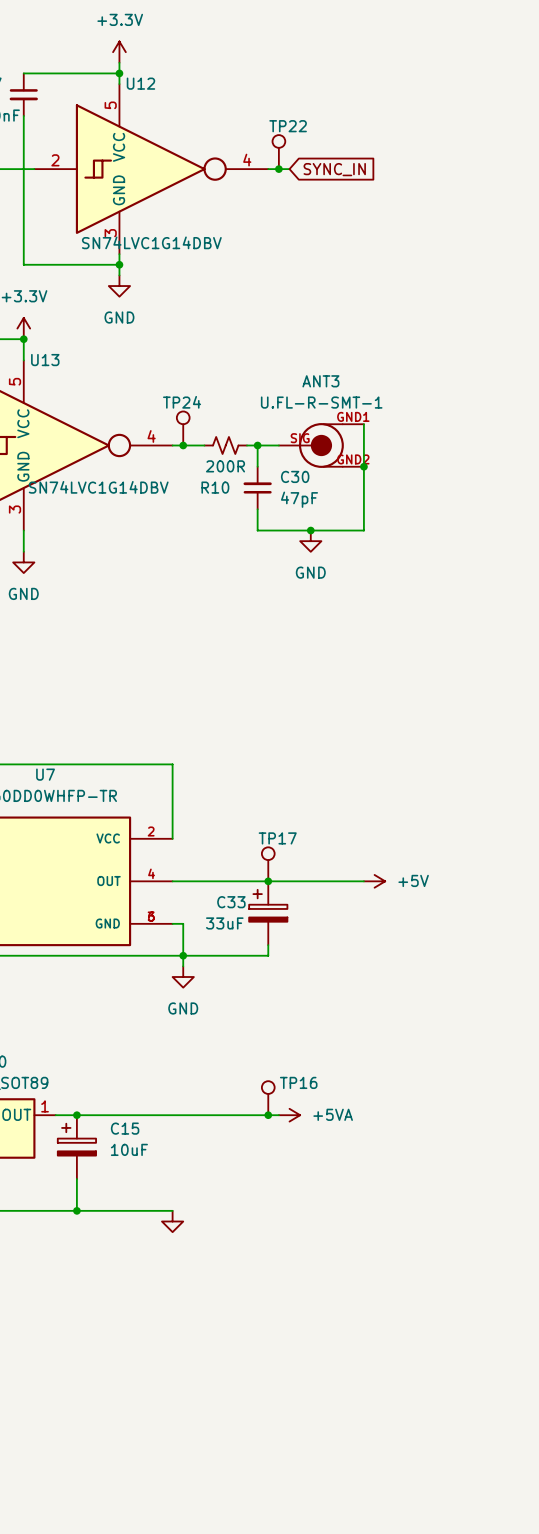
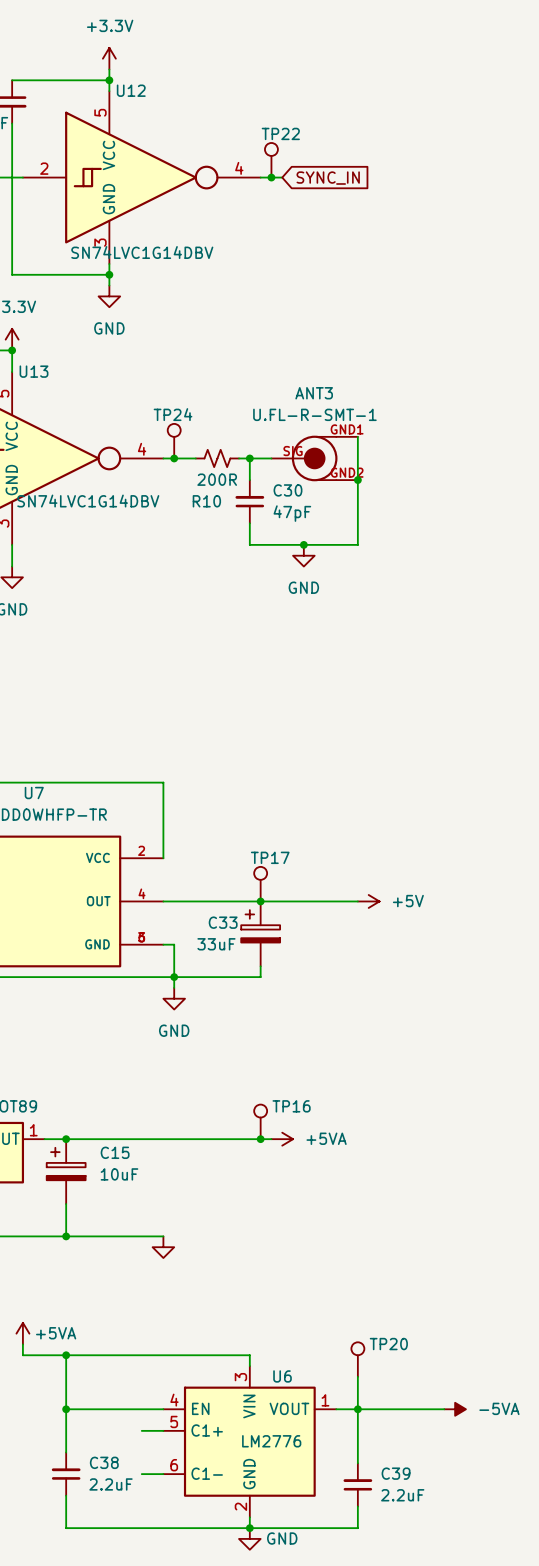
power symbol: none -> +5VA (22, 1333)
wire: none -> (22, 1344) (22, 1355) (249, 1355) (249, 1366)
wire: none -> (66, 1355) (66, 1452)
junction: none -> (66, 1355)
TP20: none -> (357, 1359)
wire: none -> (357, 1376) (357, 1463)
wire: none -> (66, 1409) (163, 1409)
junction: none -> (66, 1409)
wire: none -> (336, 1409) (444, 1409)
junction: none -> (357, 1409)
power symbol: none -> -5VA (455, 1409)
wire: none -> (141, 1430) (163, 1430)
U6: none -> LM2776 (249, 1441)
C38: none -> 2.2uF (66, 1474)
wire: none -> (141, 1474) (163, 1474)
C39: none -> 2.2uF (357, 1484)
wire: none -> (66, 1495) (66, 1528) (357, 1528) (357, 1506)
wire: none -> (249, 1517) (249, 1528)
junction: none -> (249, 1528)
power symbol: none -> GND (249, 1538)

